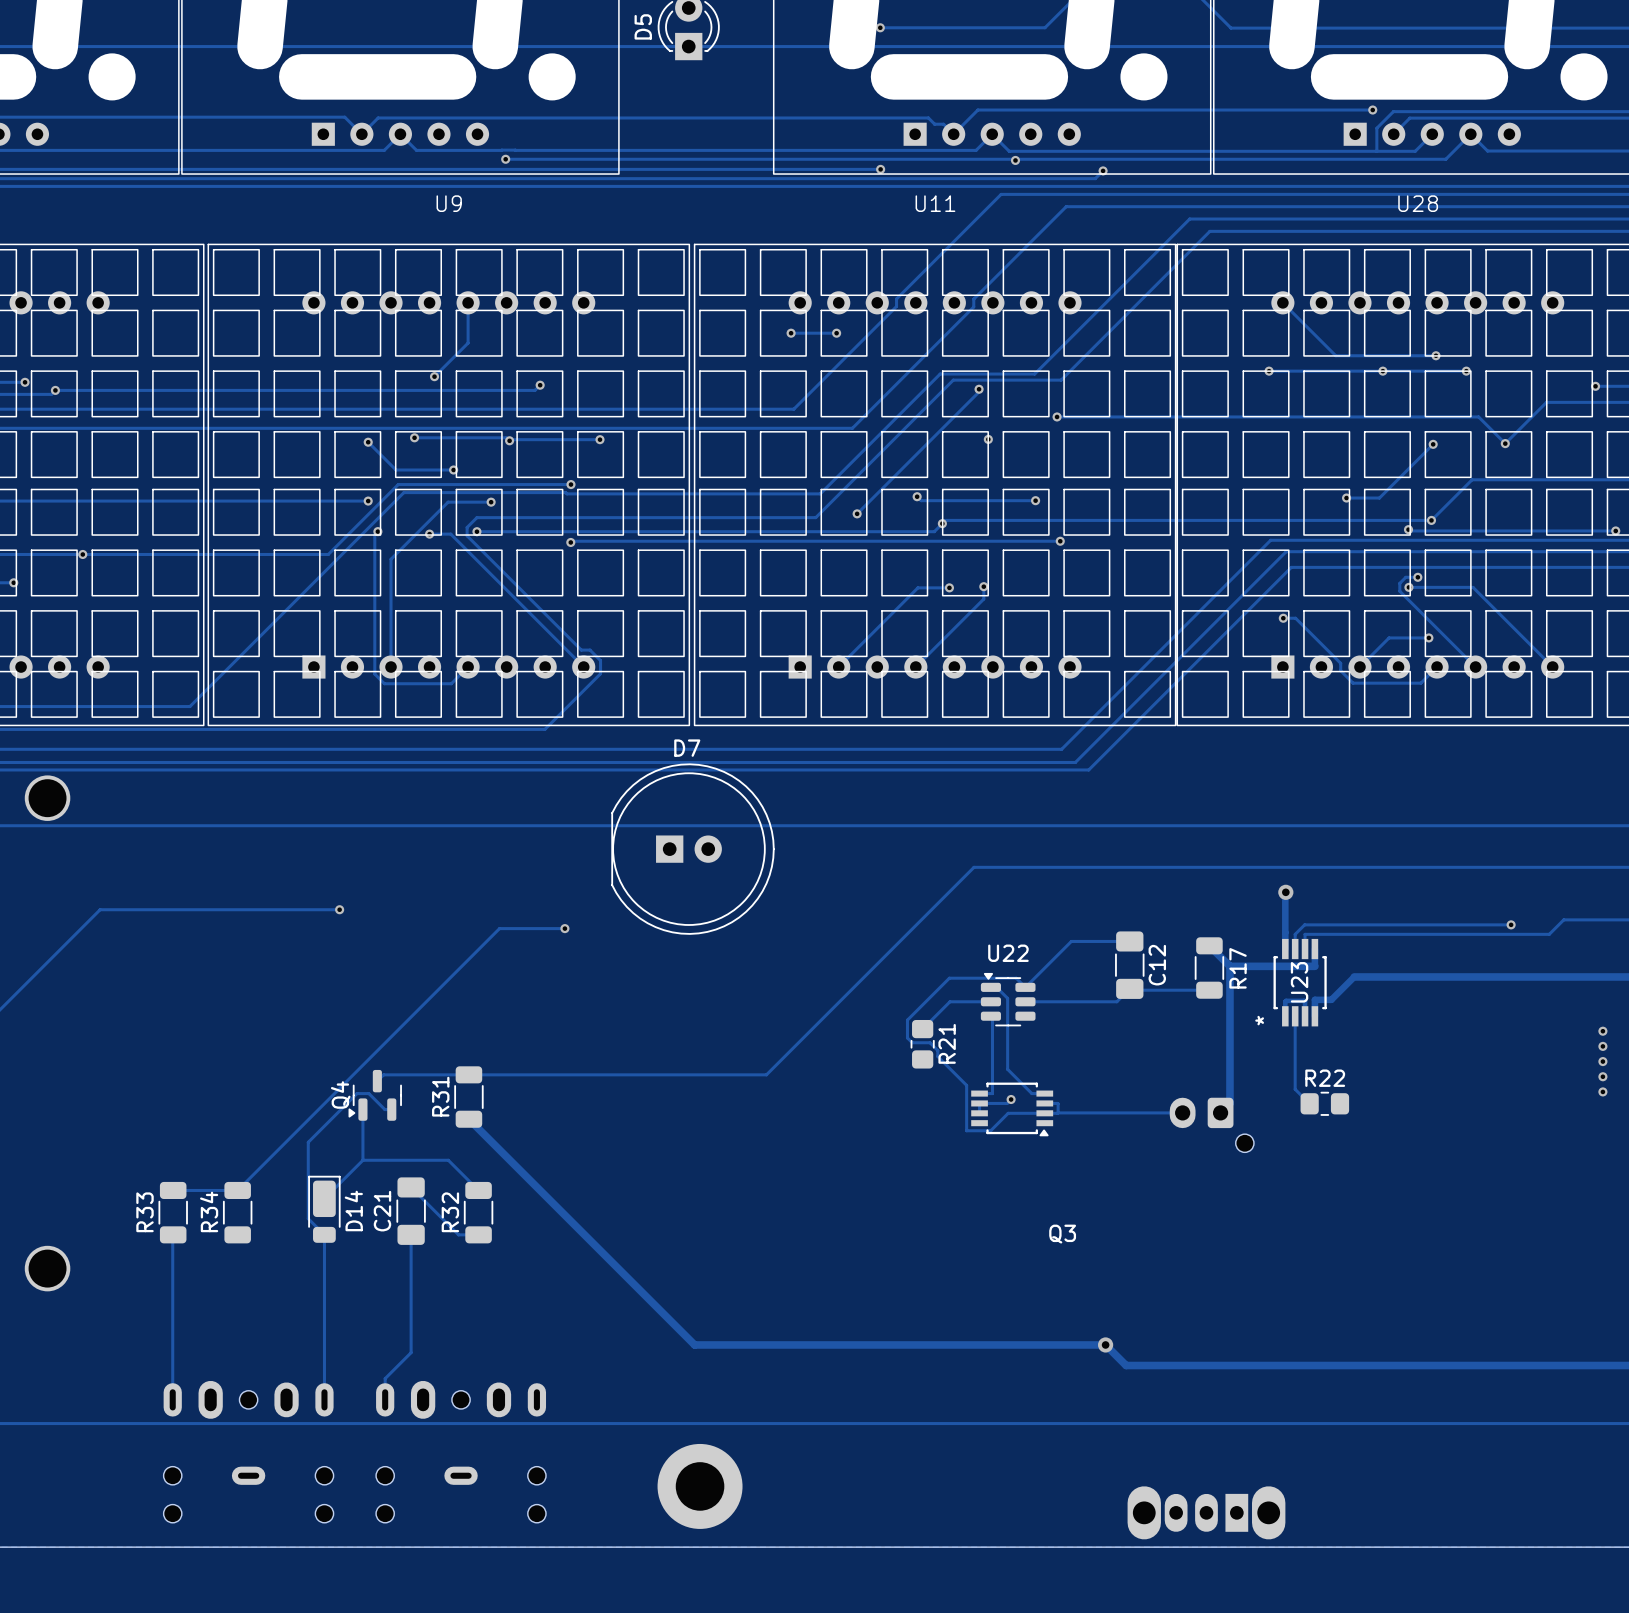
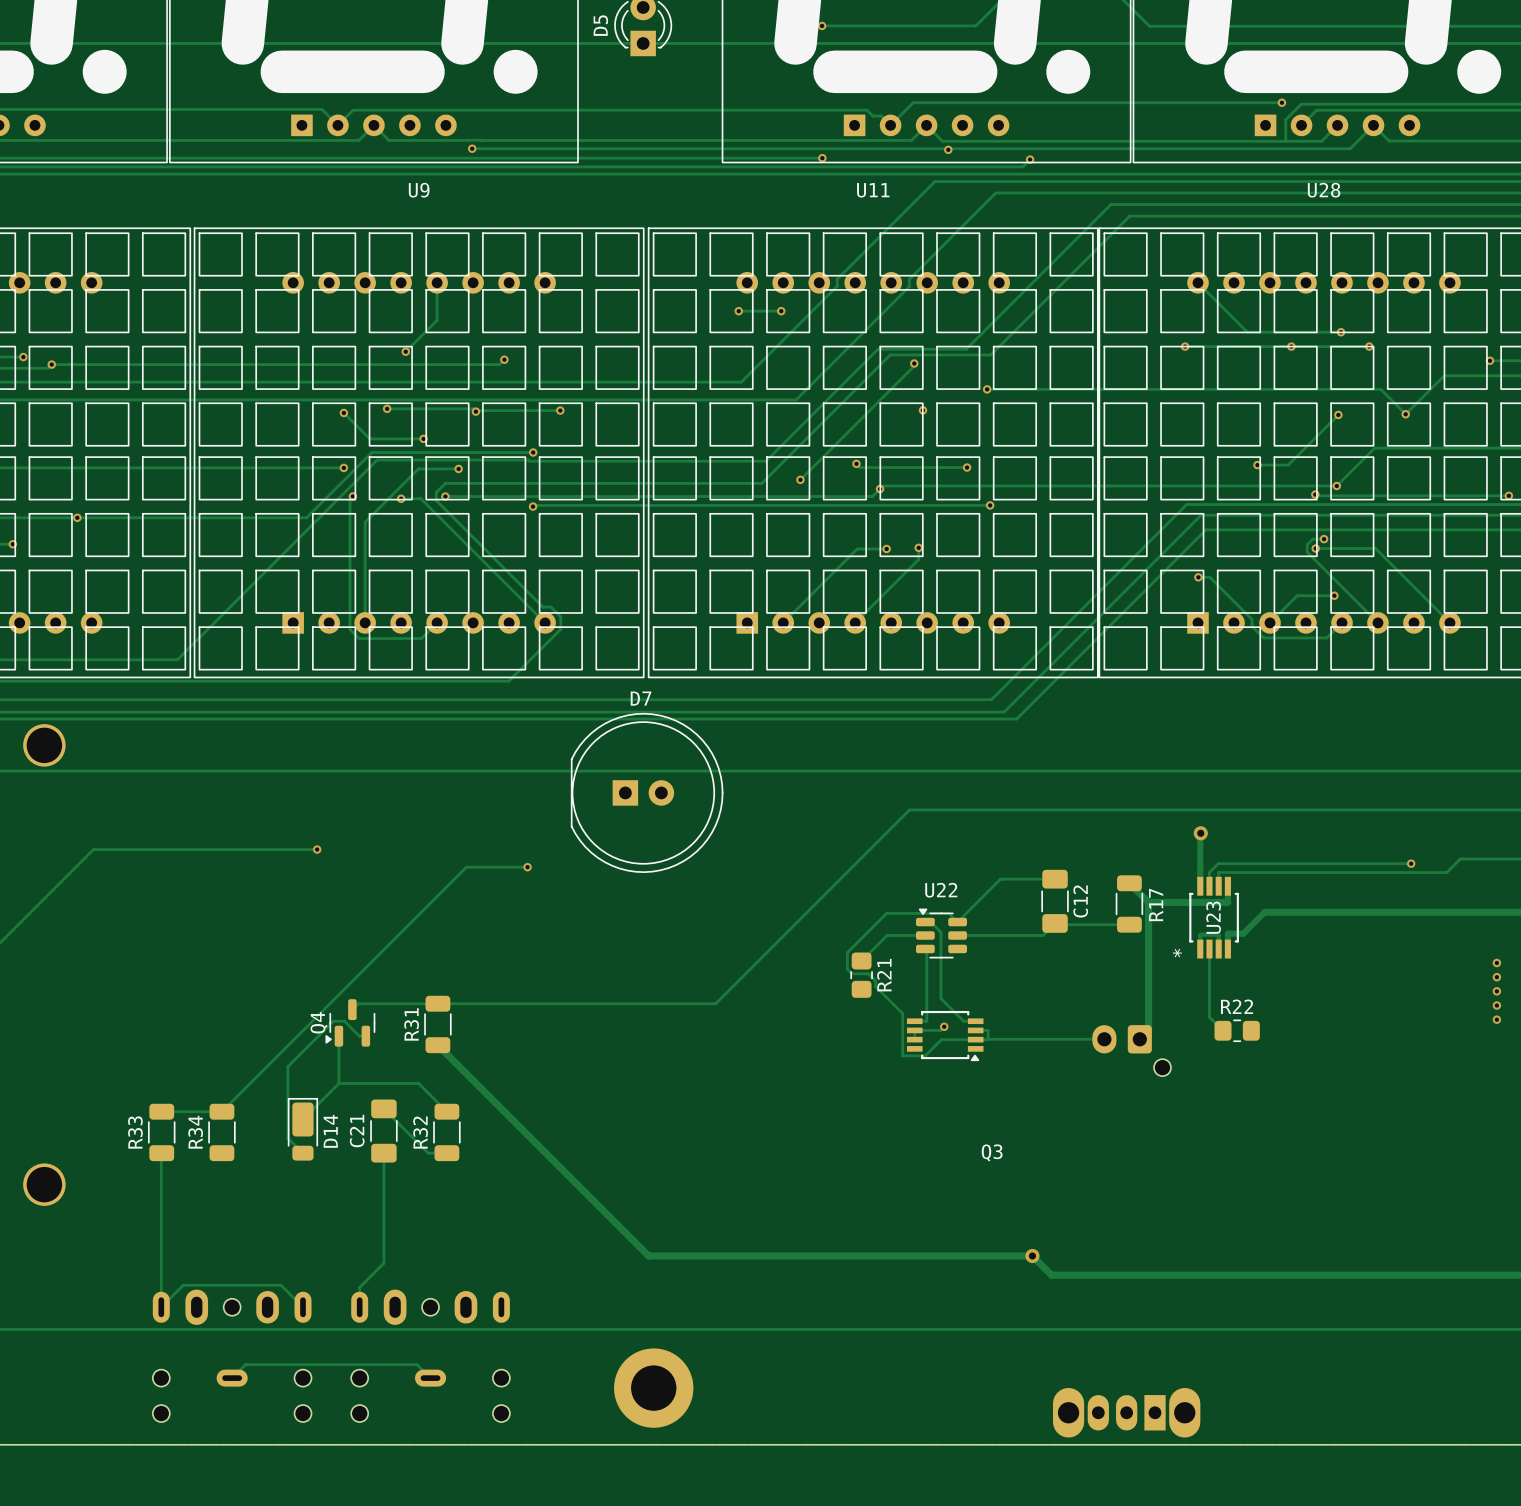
track: (324, 1234) (324, 1399) -> (161, 1307) (183, 1285) (281, 1285) (303, 1307)
track: none -> (232, 1378) (245, 1364) (417, 1364) (430, 1378)

